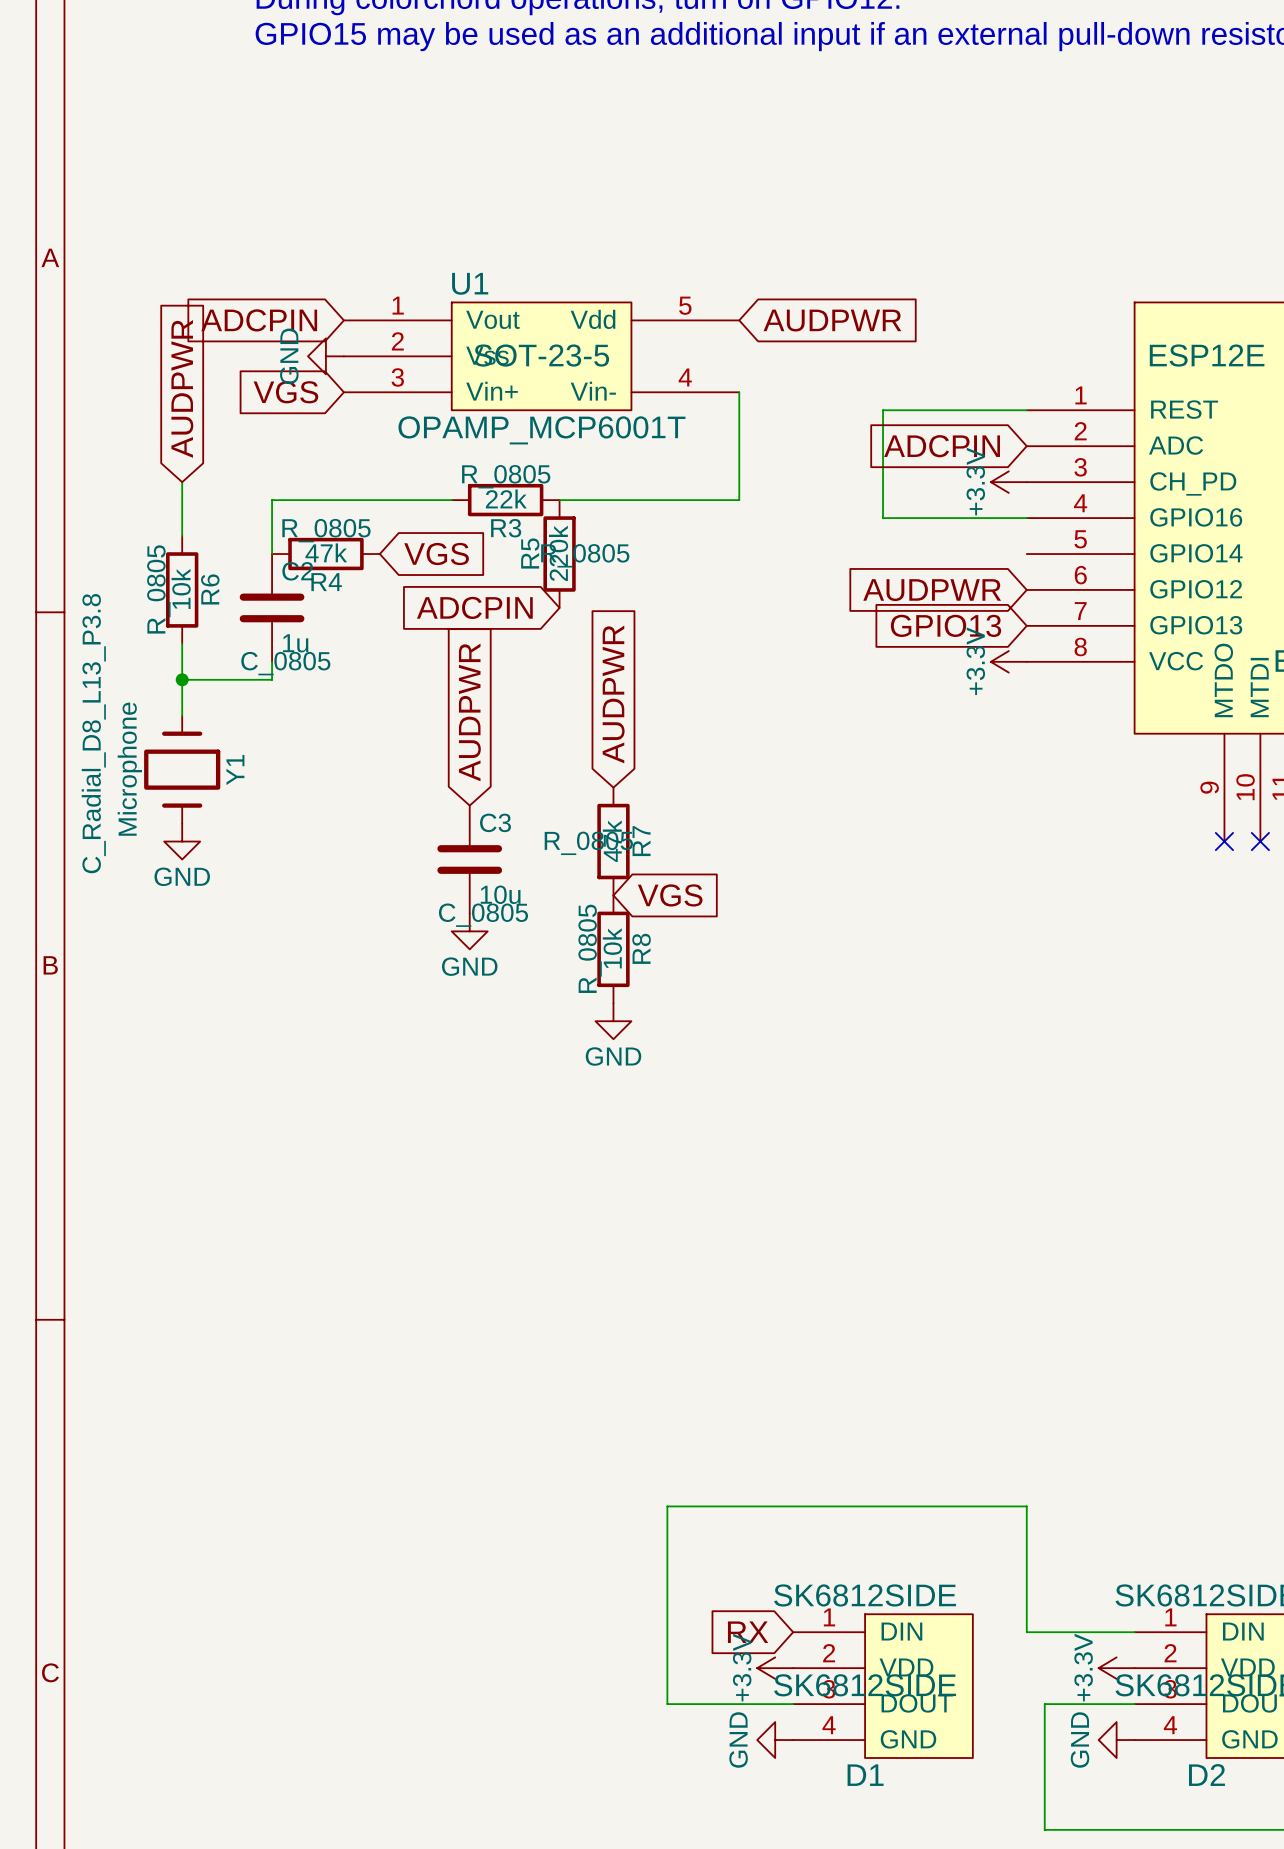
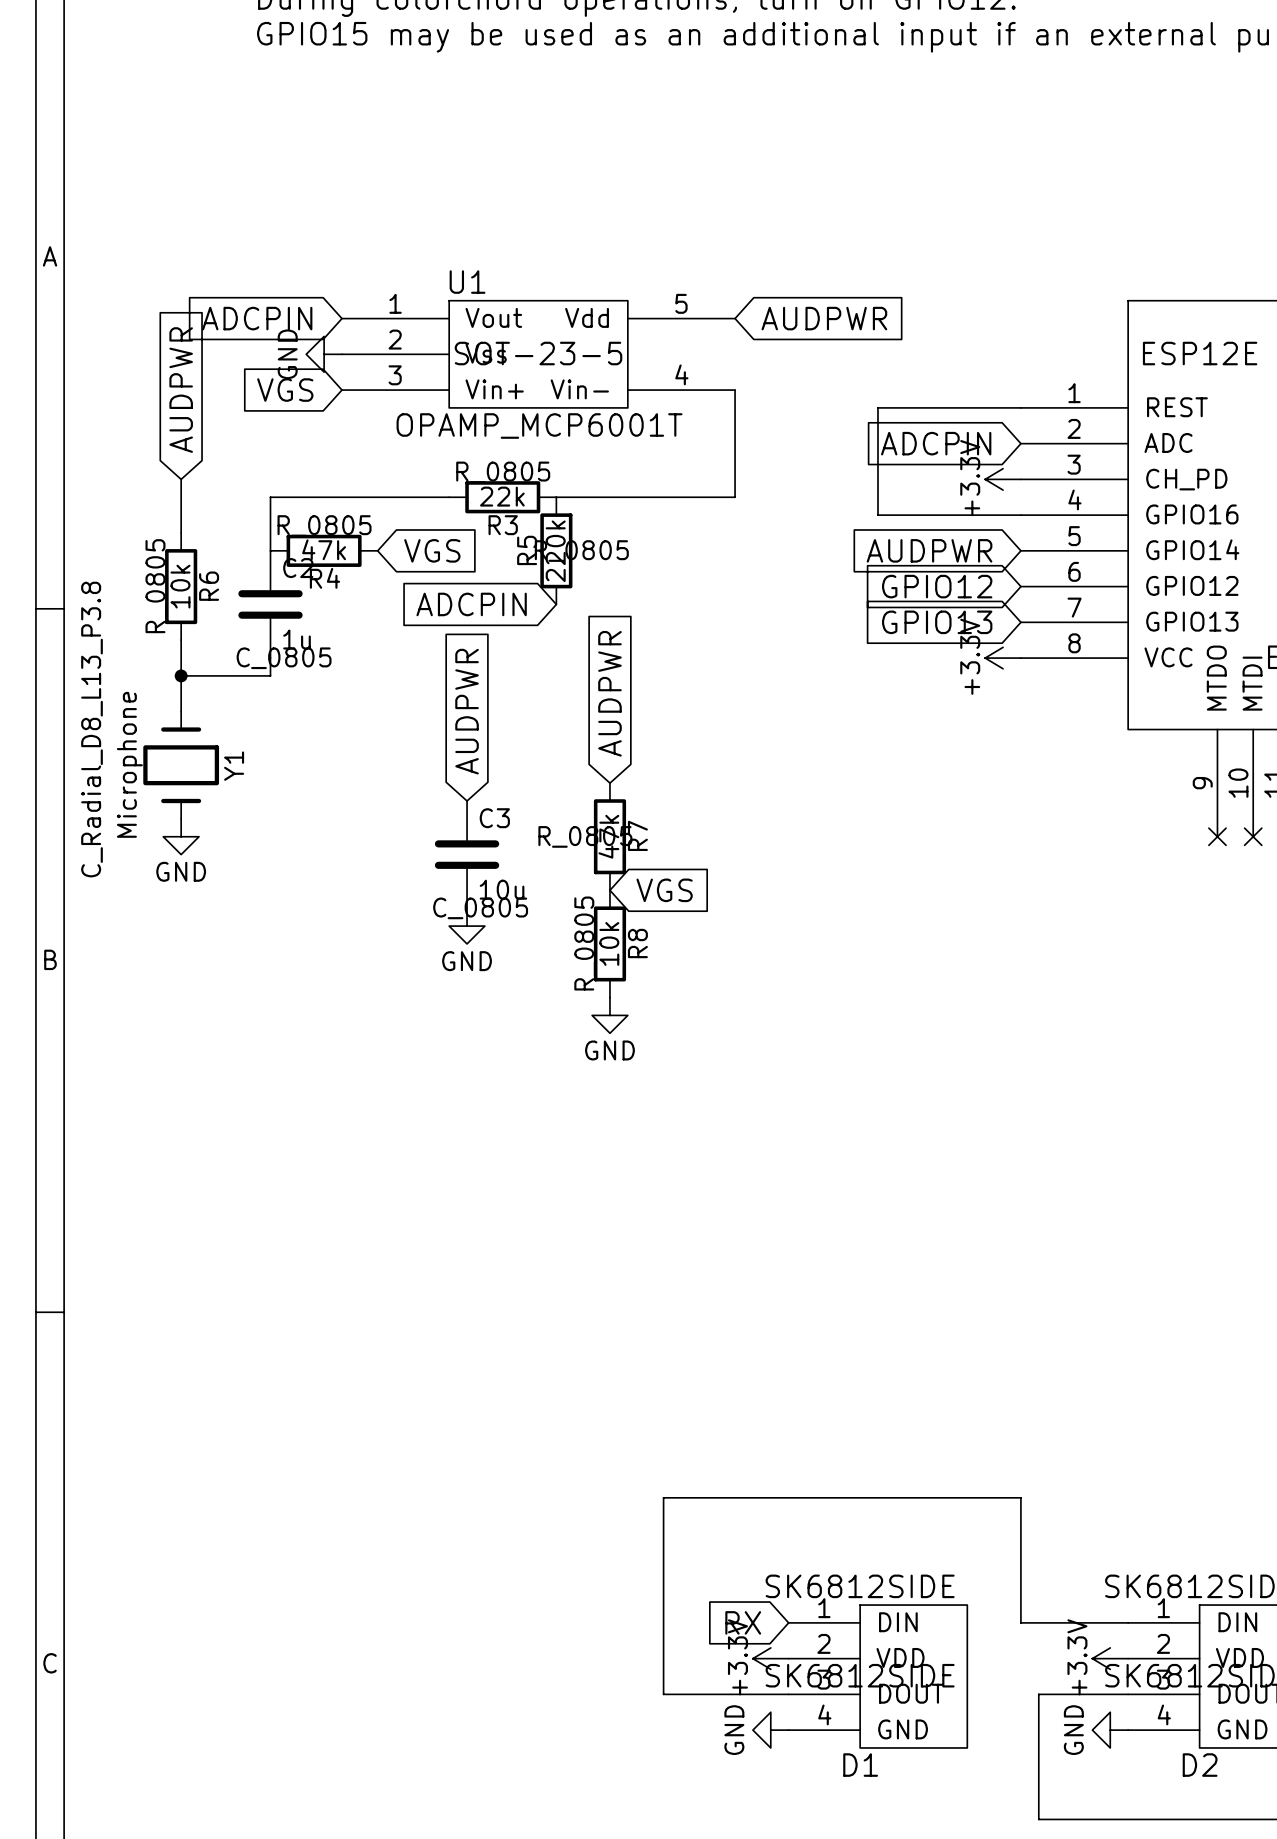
global label: none -> AUDPWR (929, 550)
global label: AUDPWR (932, 590) -> GPIO12 (937, 586)

